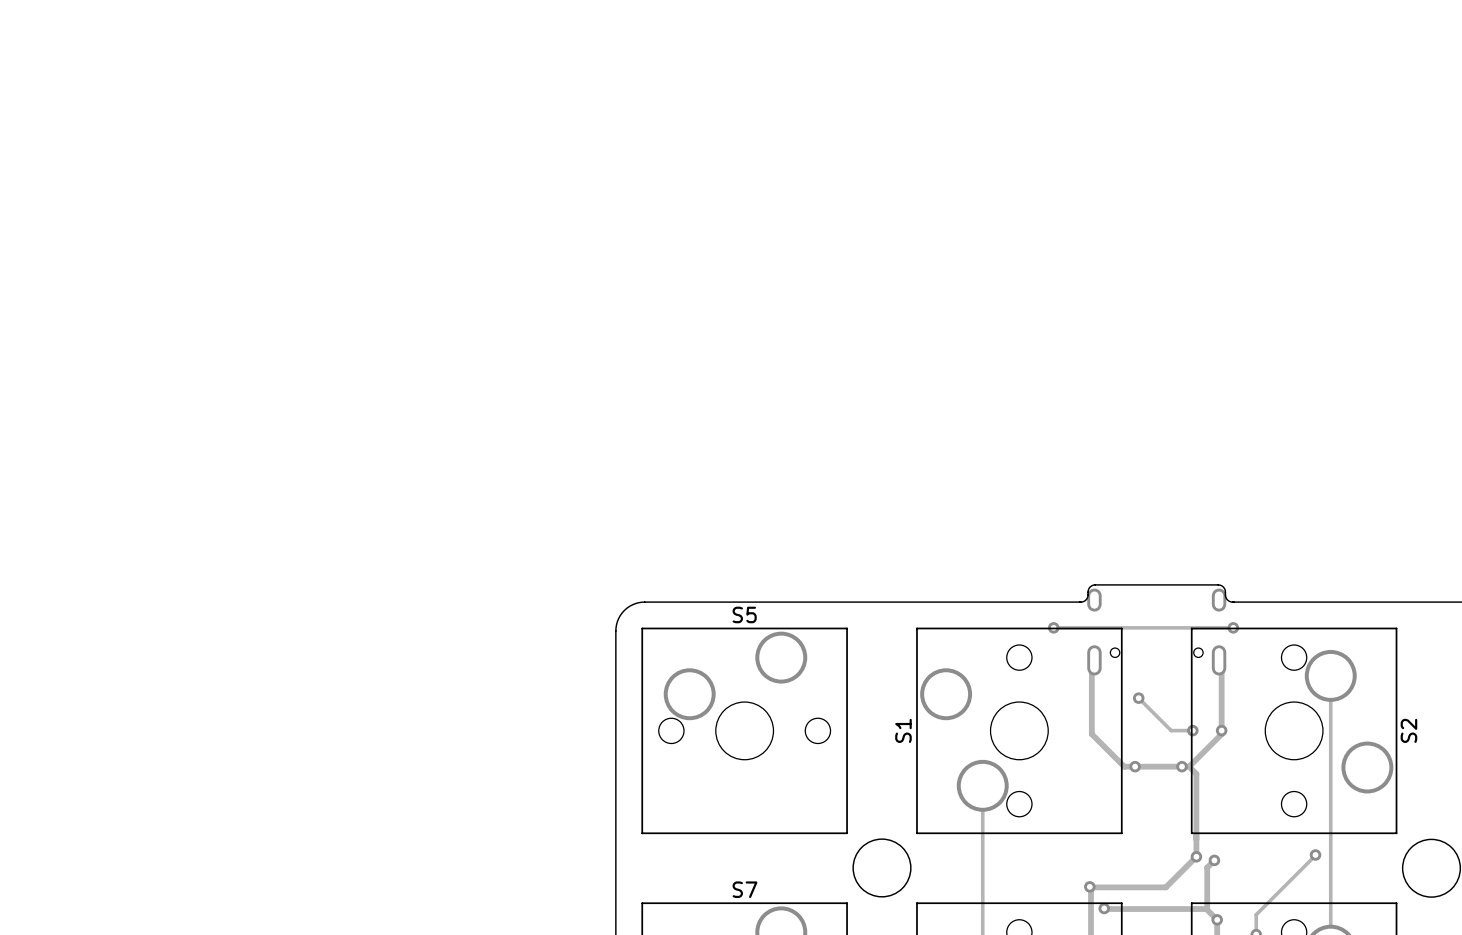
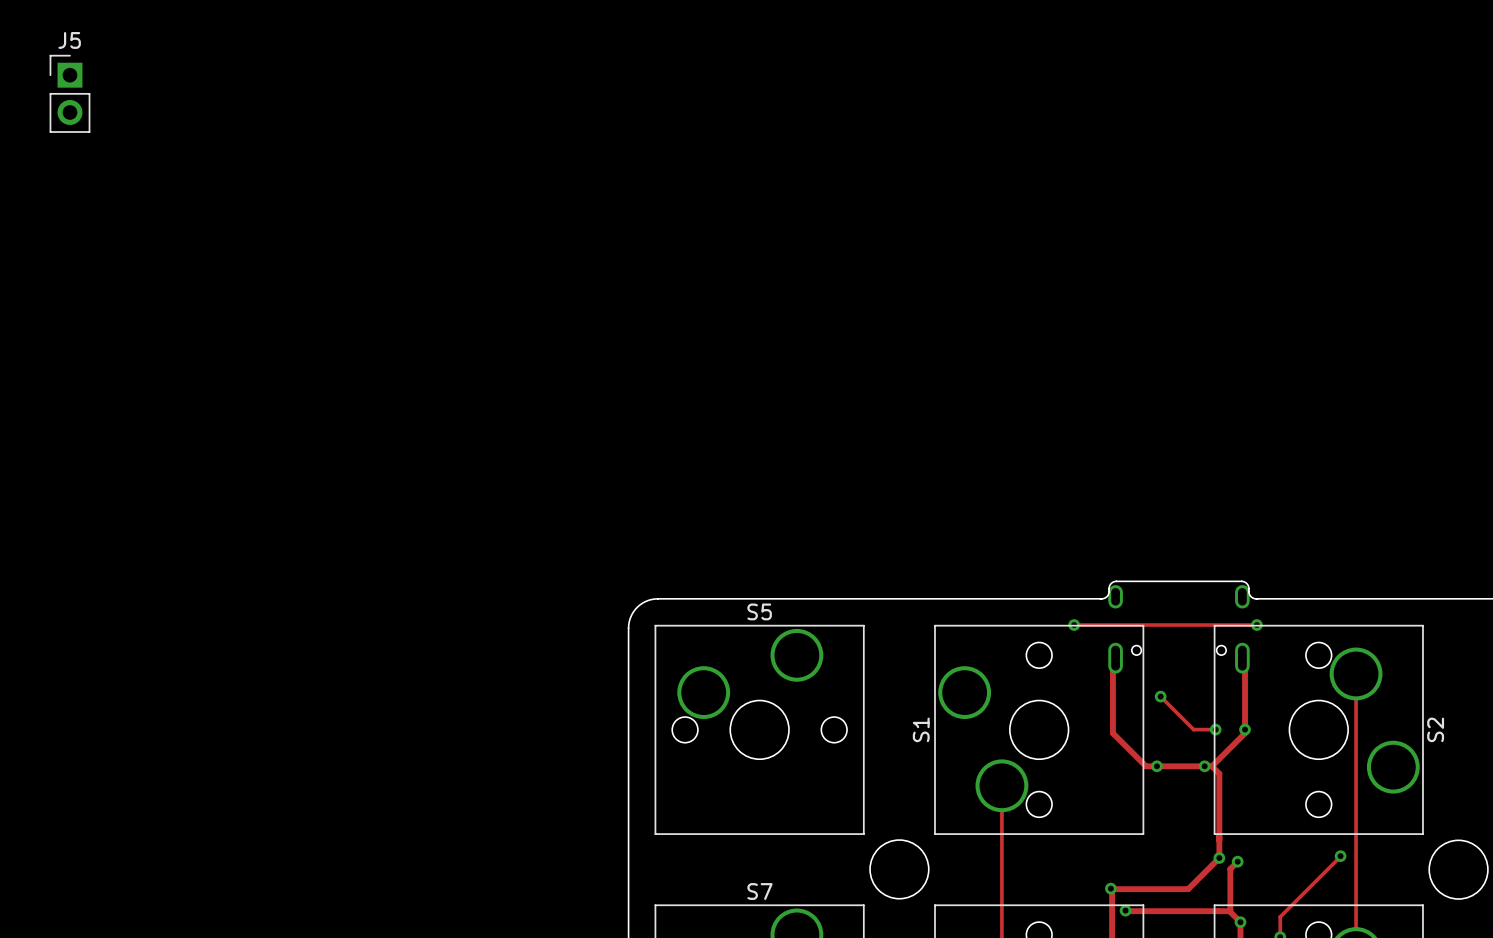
J5: none -> (69, 93)

